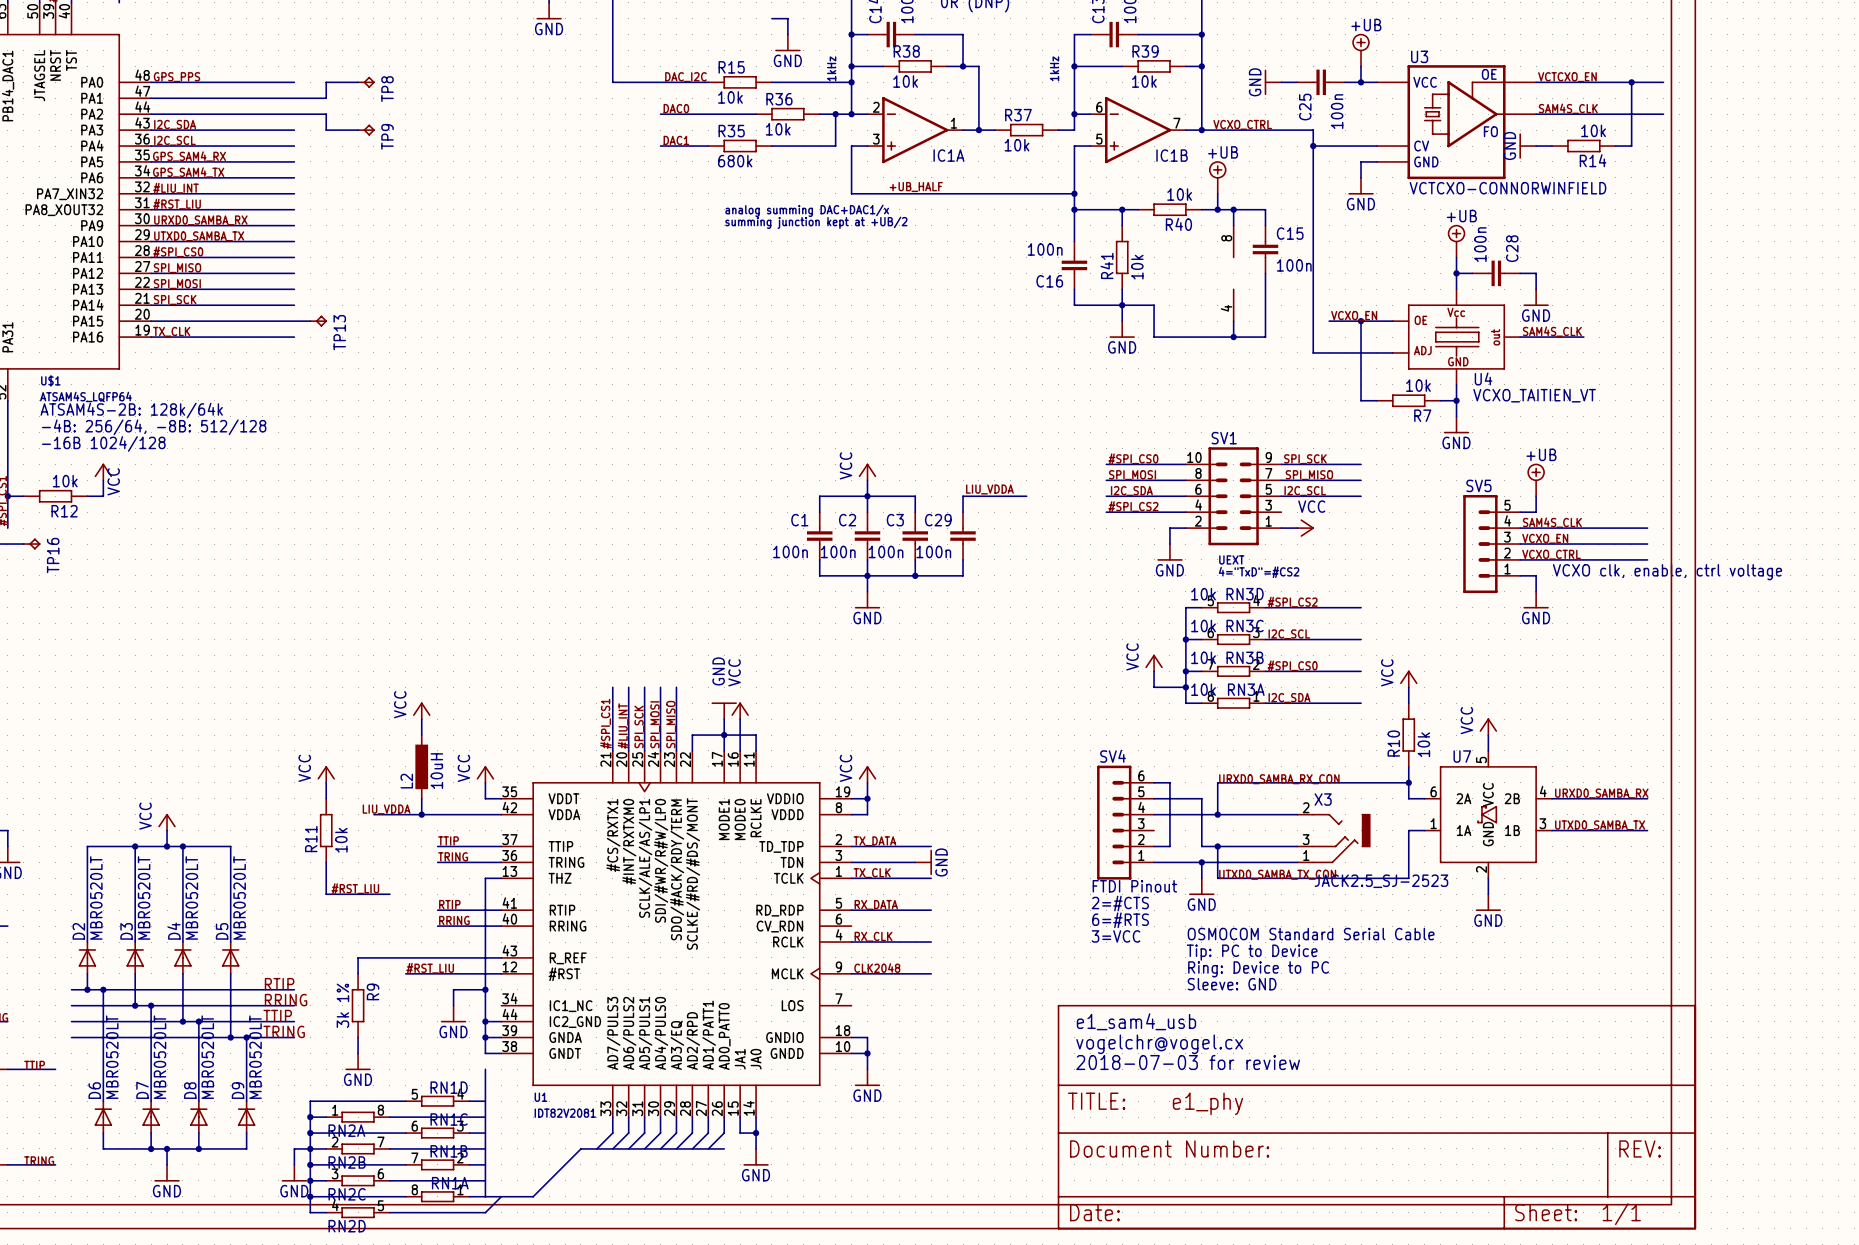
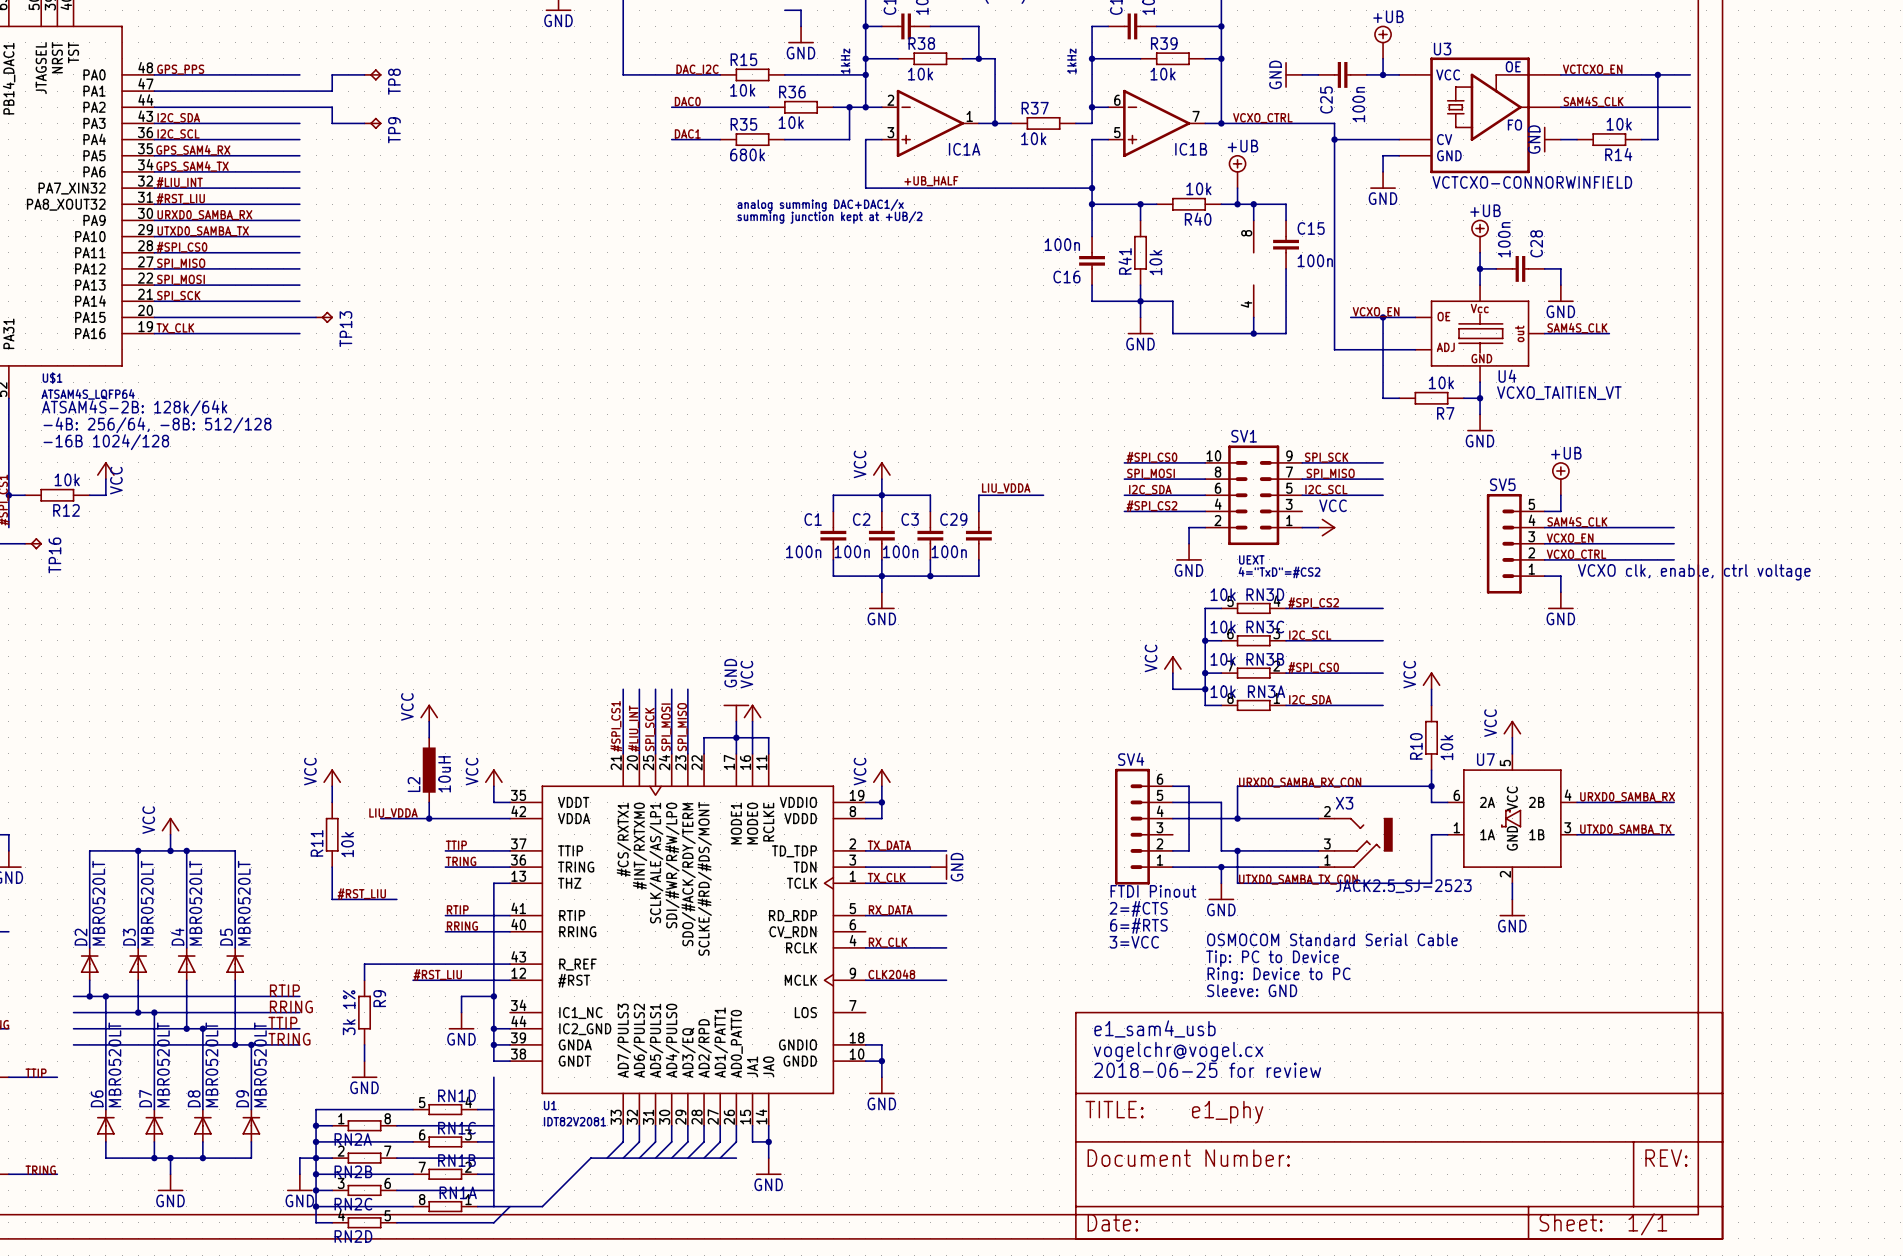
text: 2018-07-03 for review (1188, 1062) -> 2018-06-25 for review (1207, 1070)

